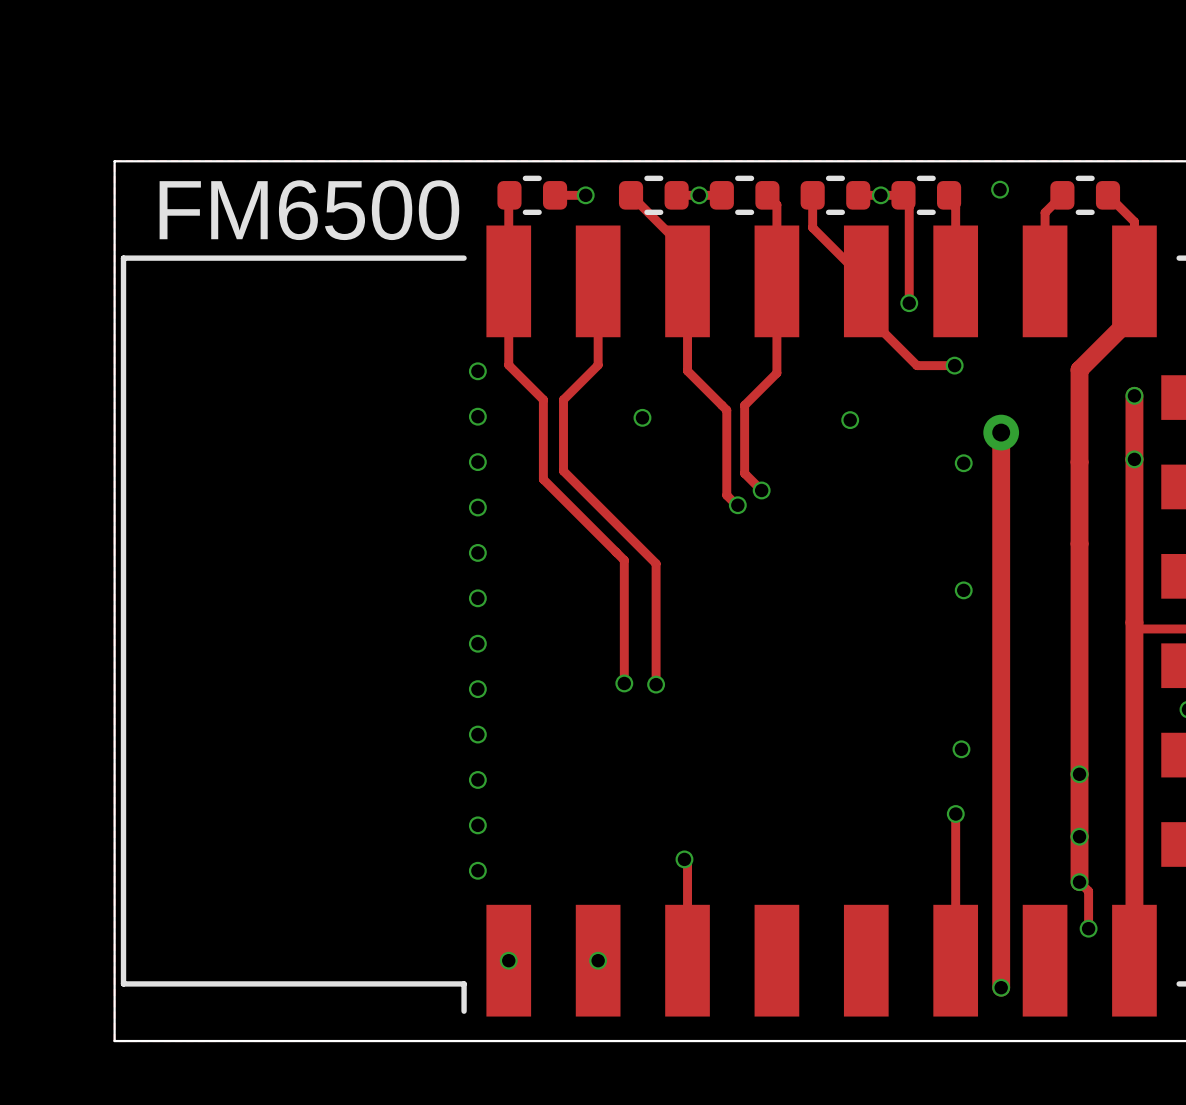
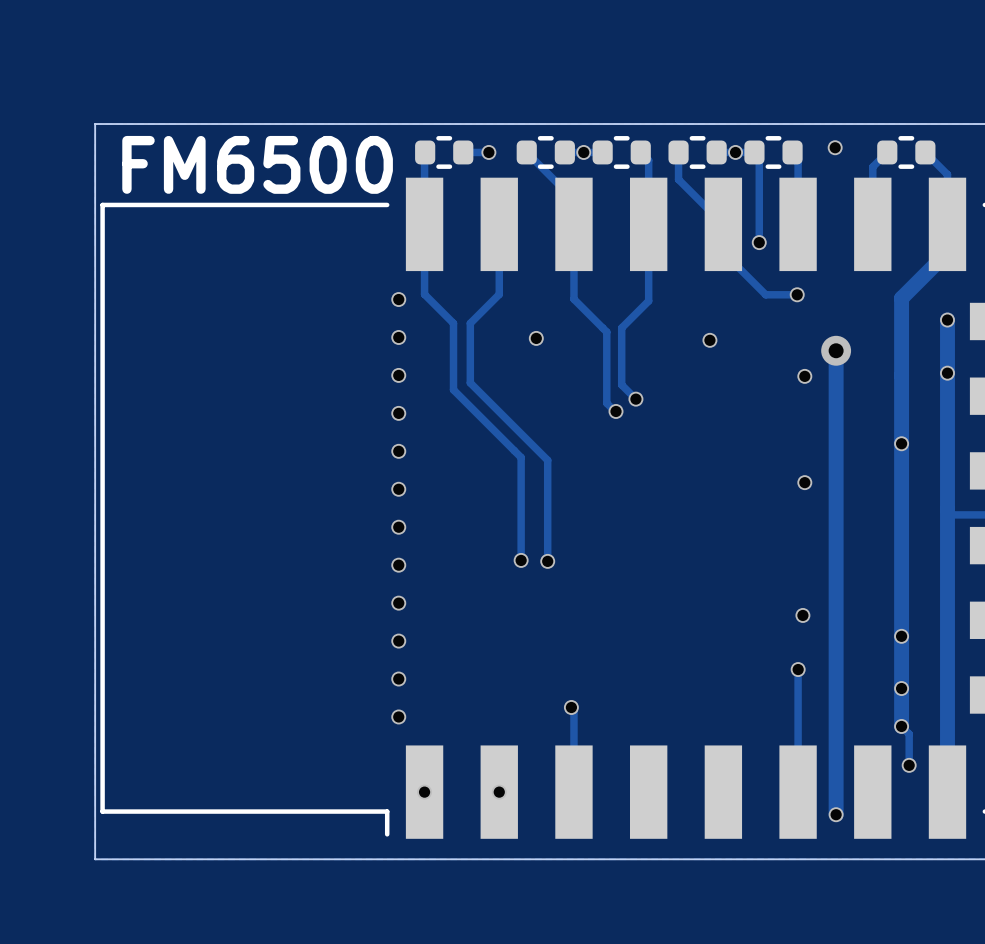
via: none -> (901, 443)

